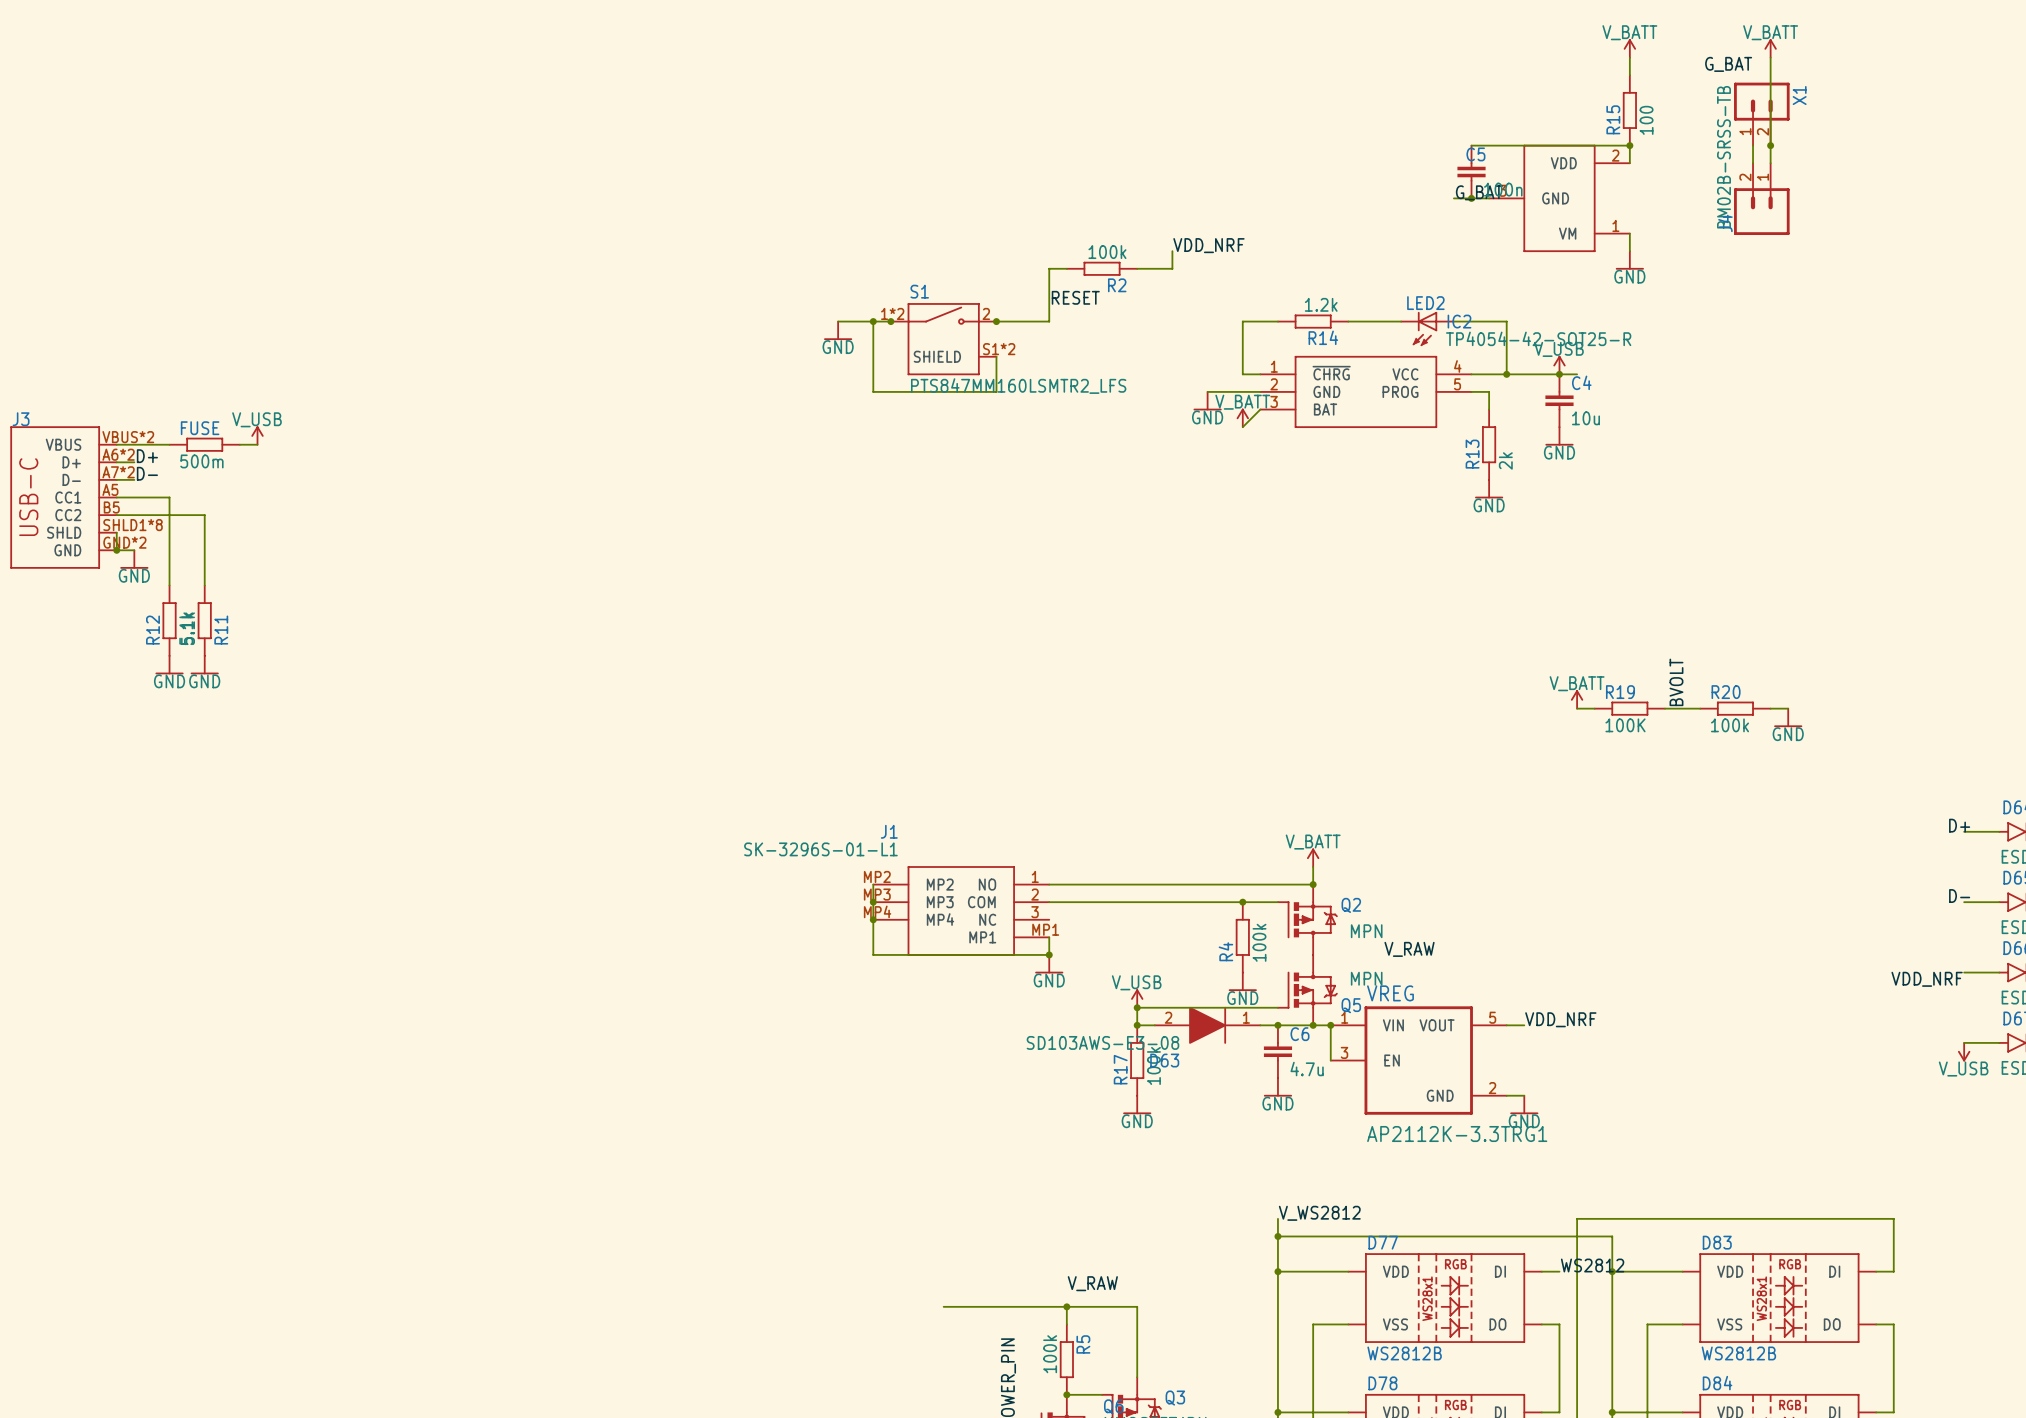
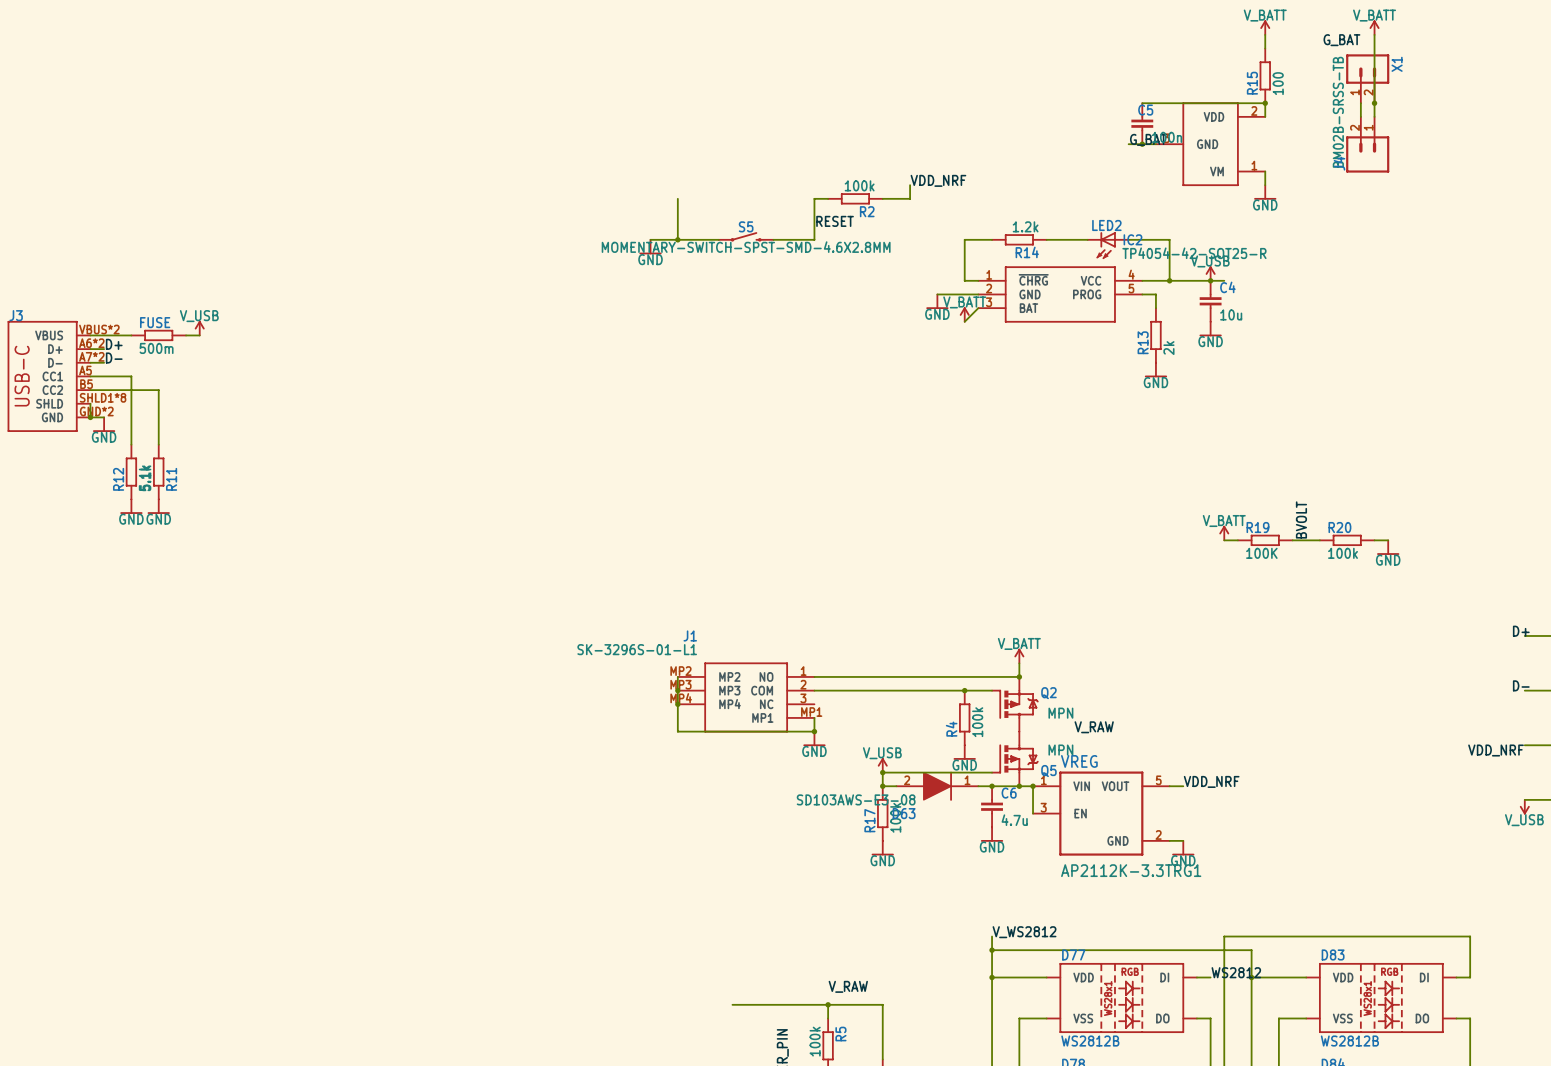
S5: none -> MOMENTARY-SWITCH-SPST-SMD-4.6X2.8MM (746, 236)
wire: (873, 321) (873, 391) (996, 391) (996, 356) -> (677, 239) (677, 198)
junction: (890, 321) -> none
junction: (996, 321) -> none
S1: PTS847MM160LSMTR2_LFS (943, 339) -> none

